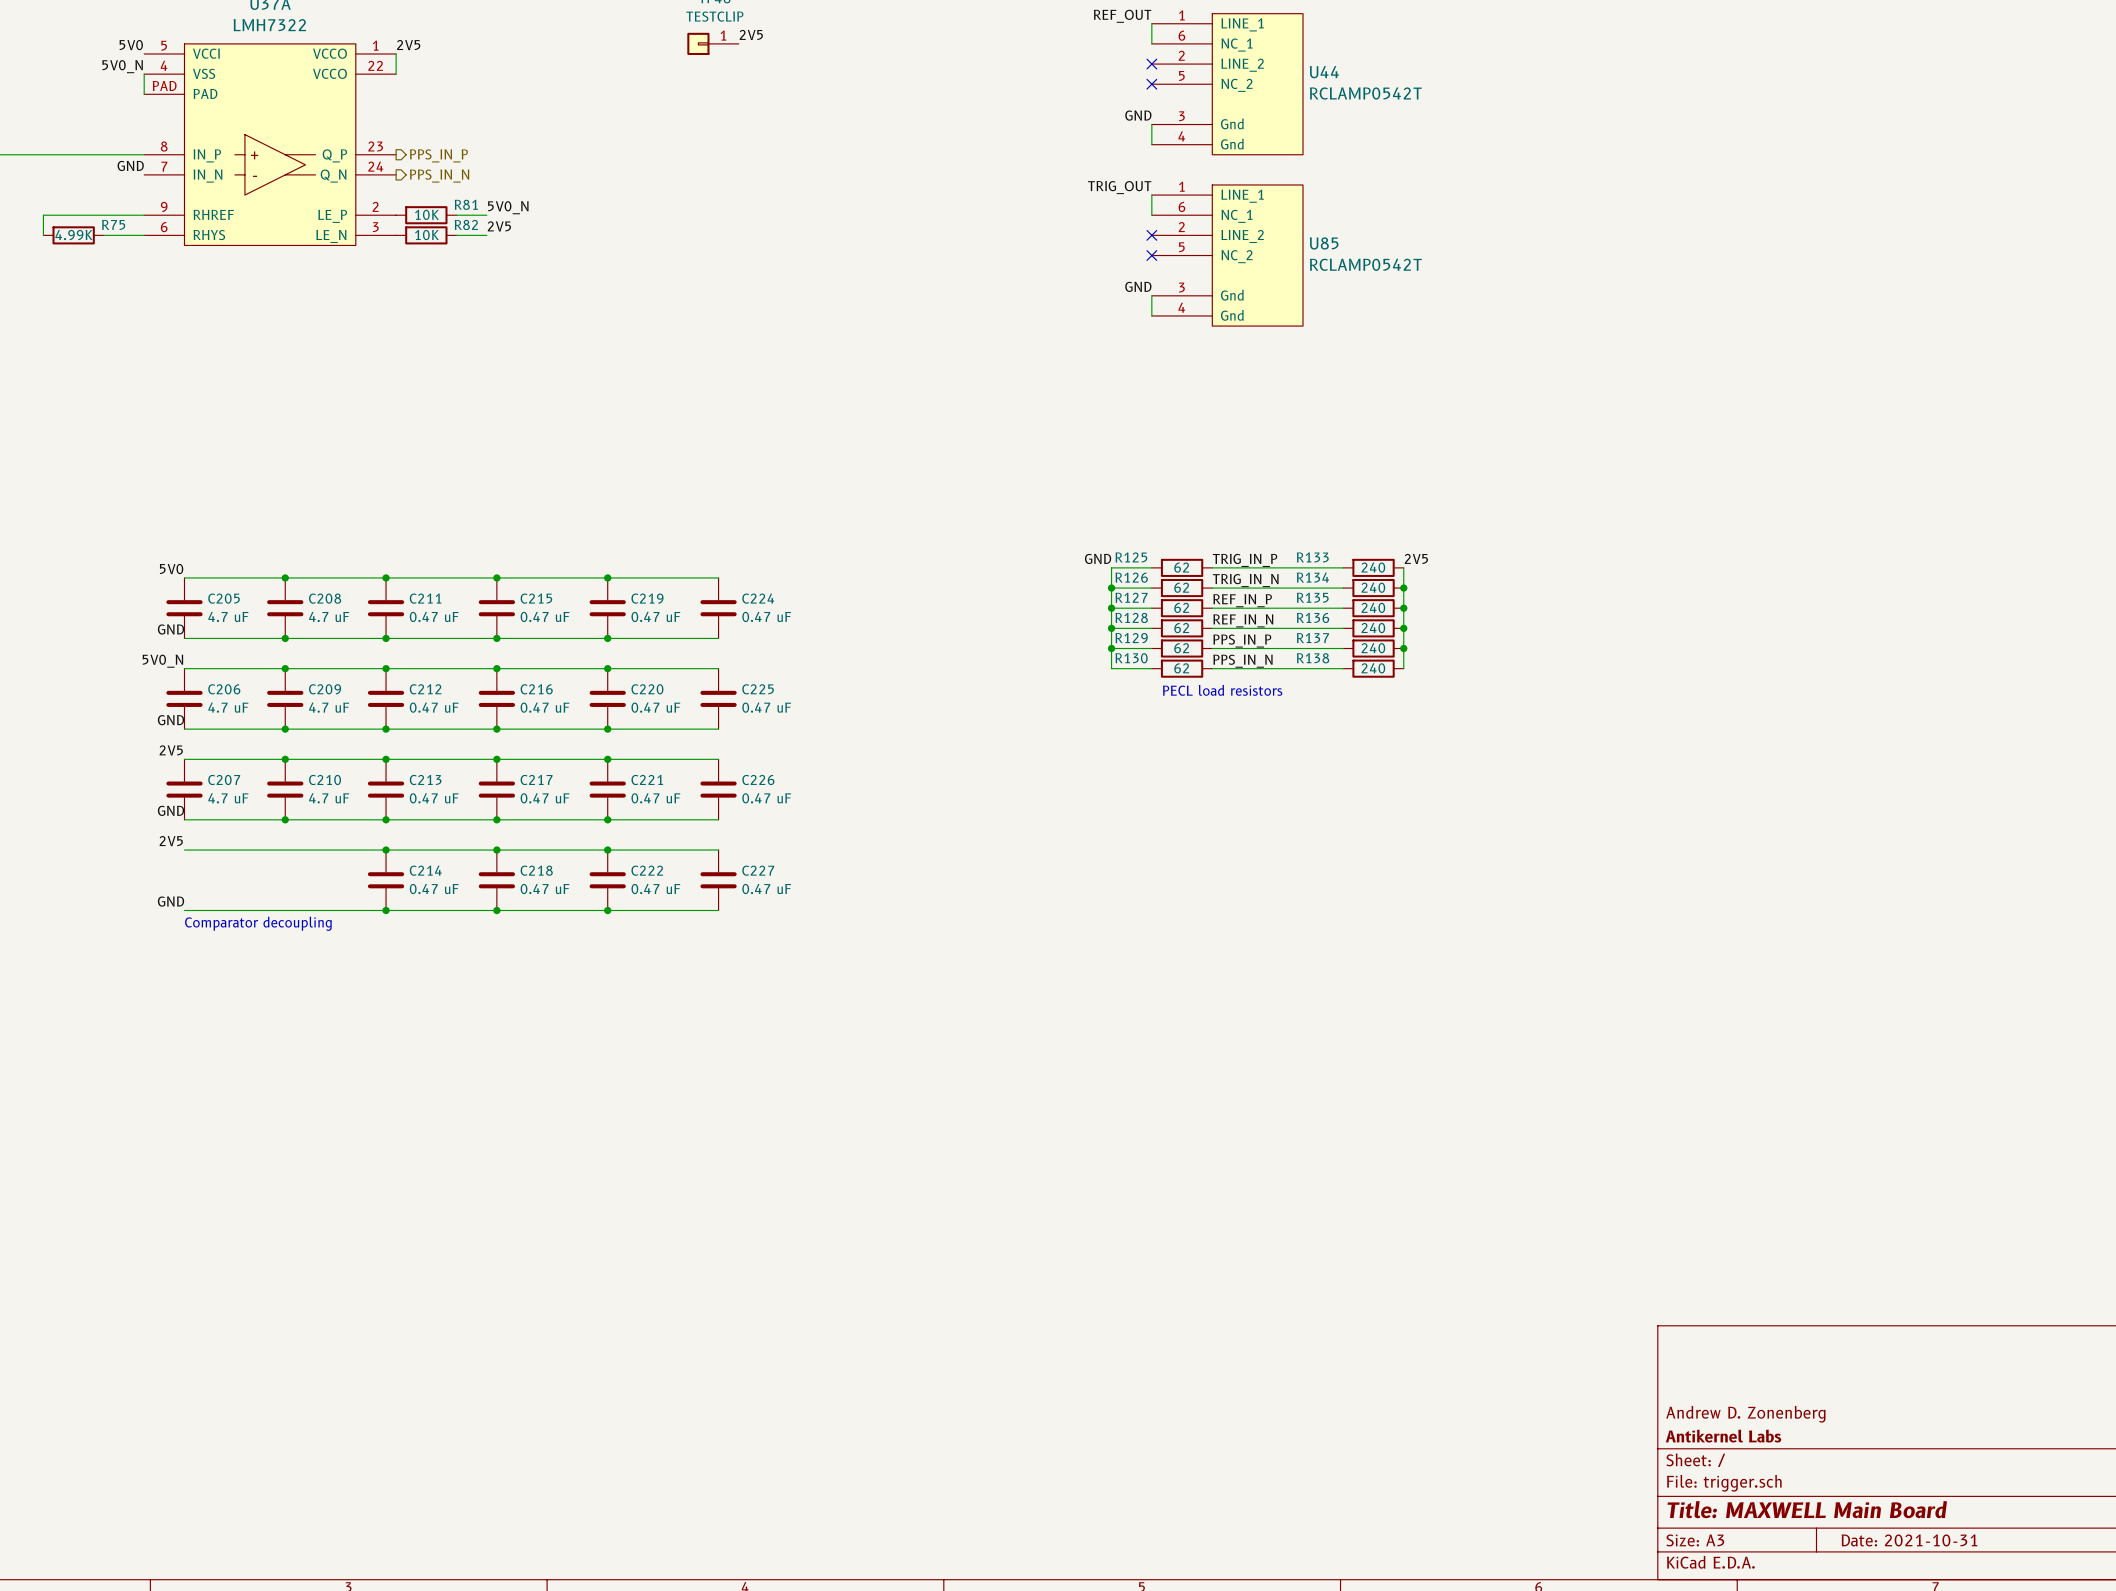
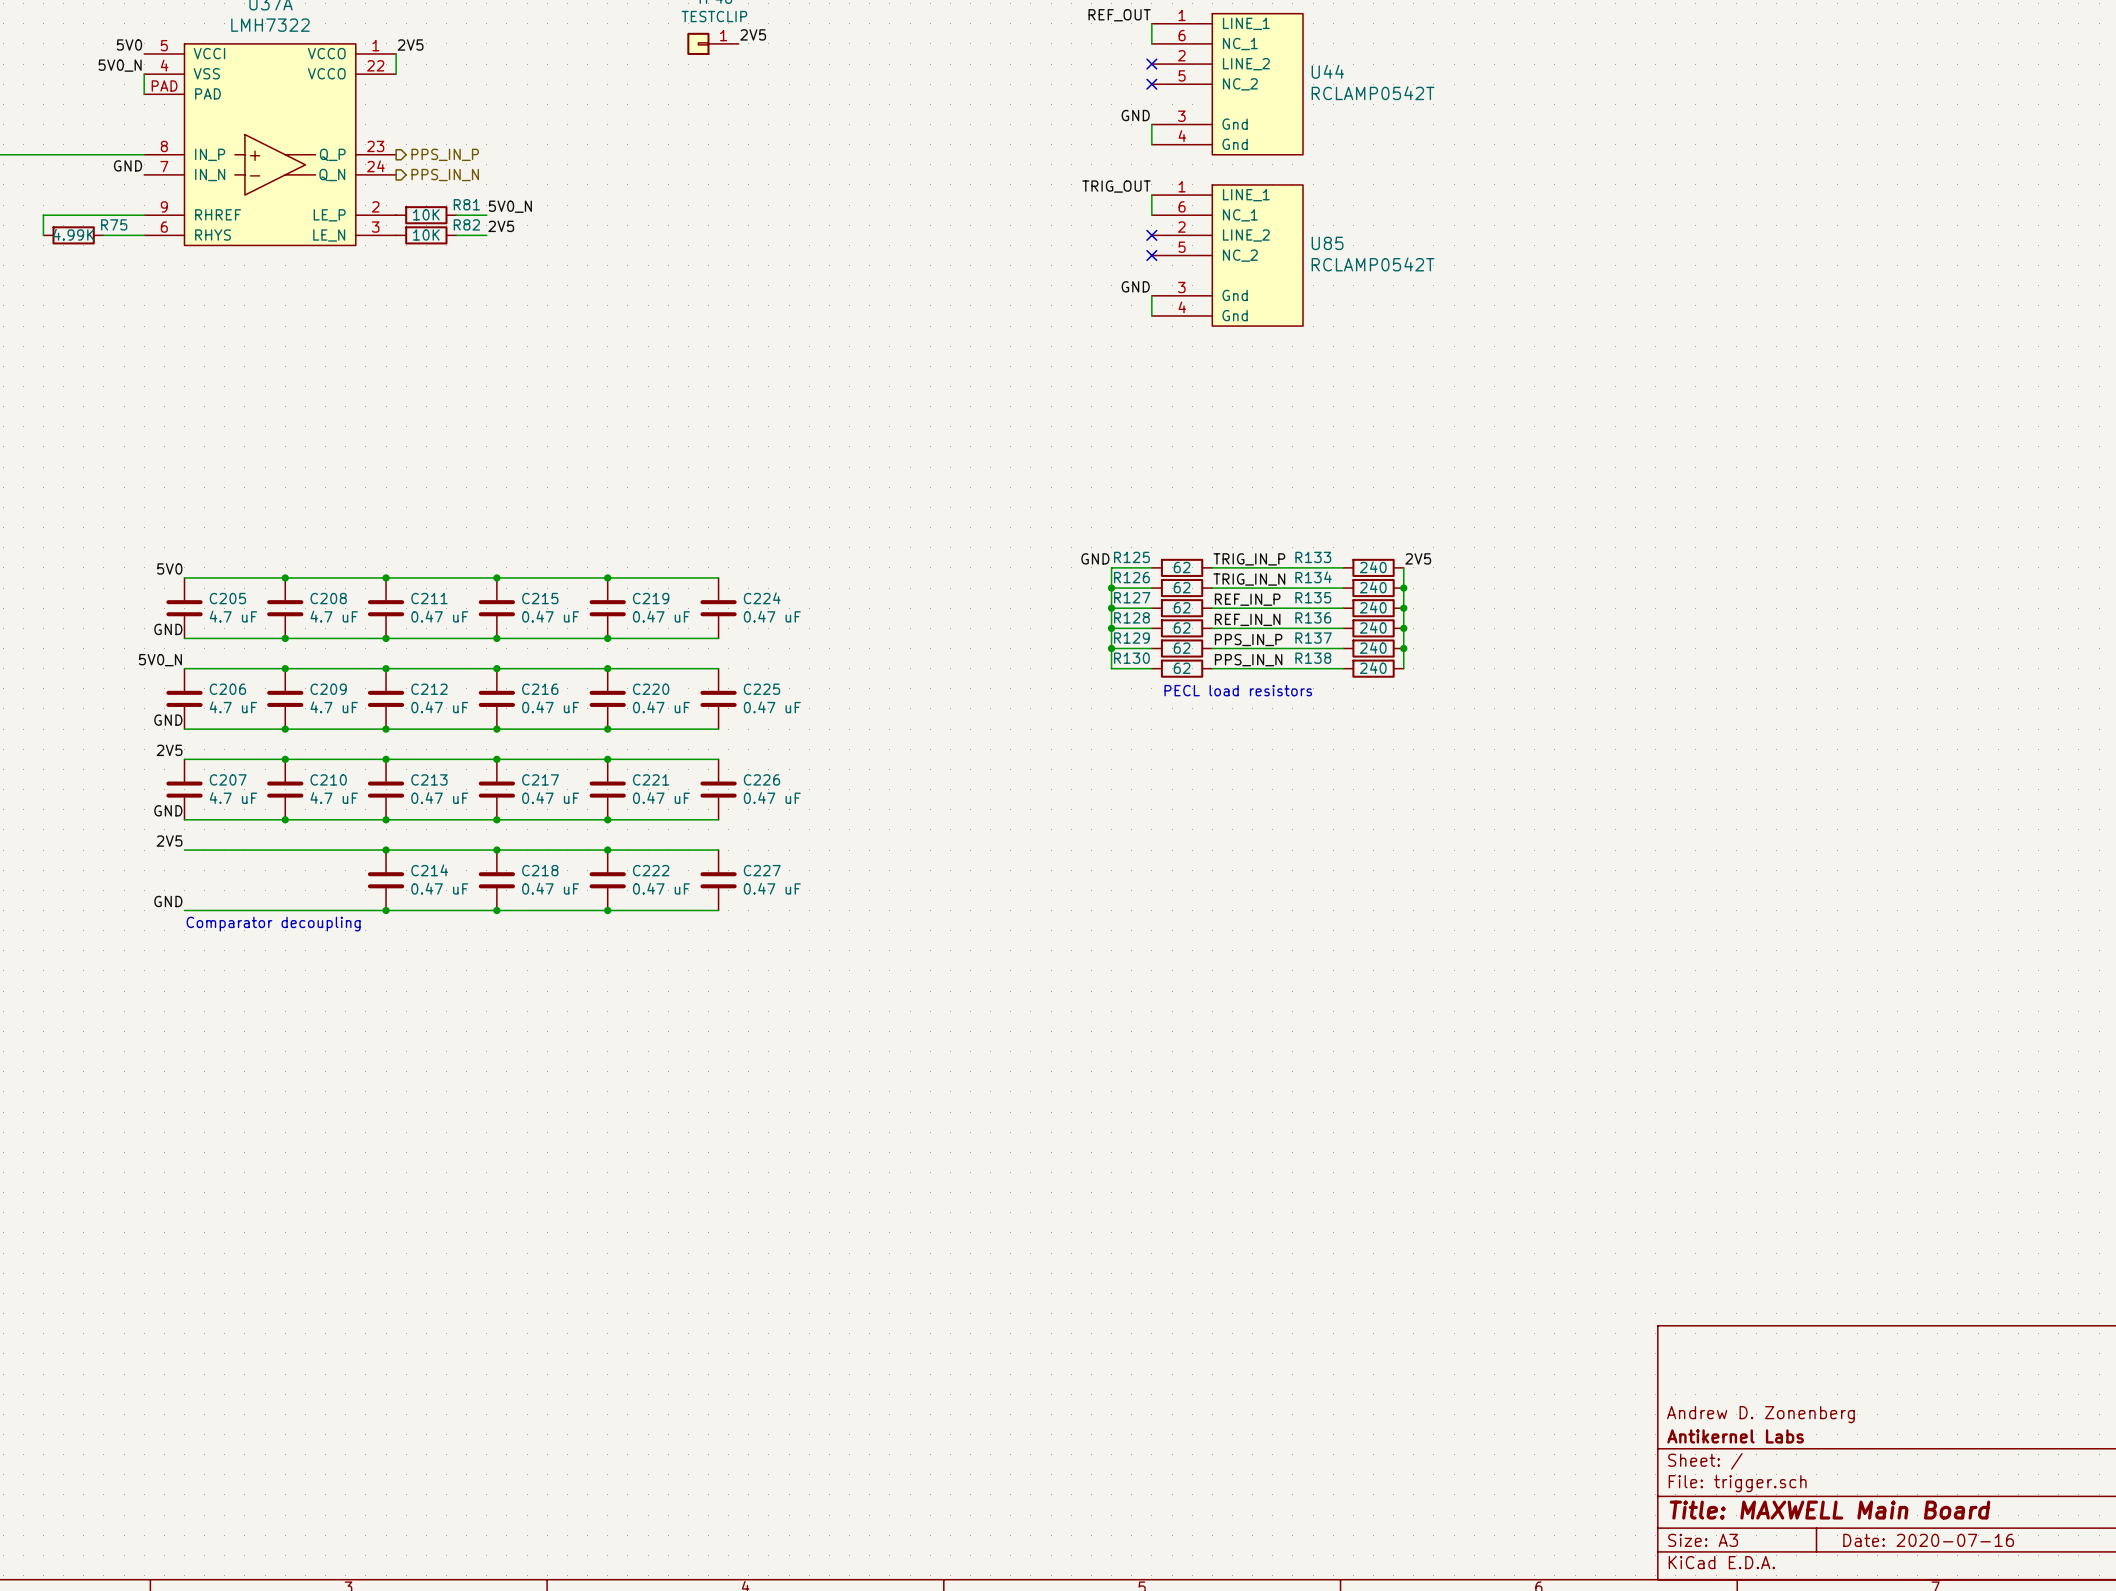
title block: Date: 2021-10-31 (1909, 1540) -> Date: 2020-07-16 (1928, 1540)

